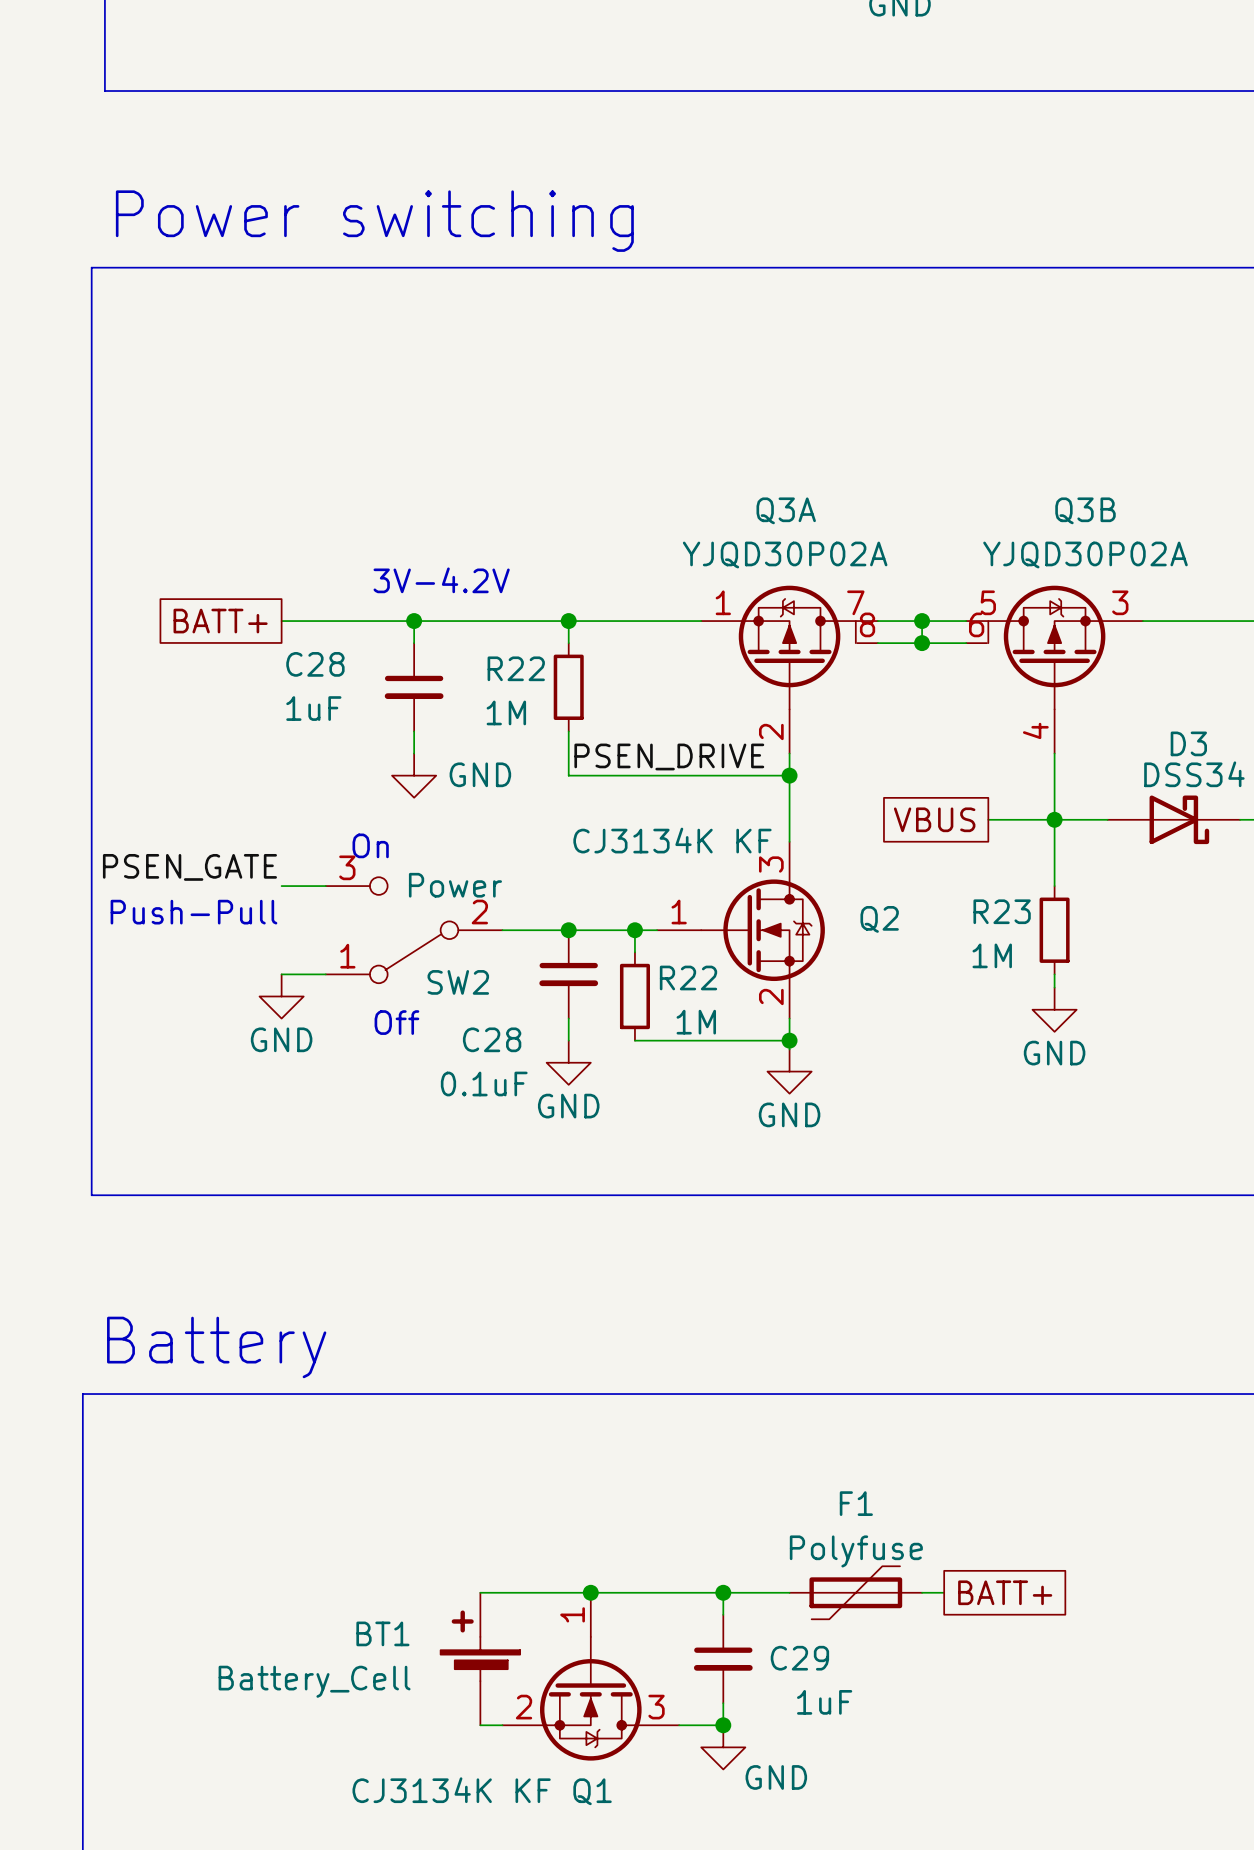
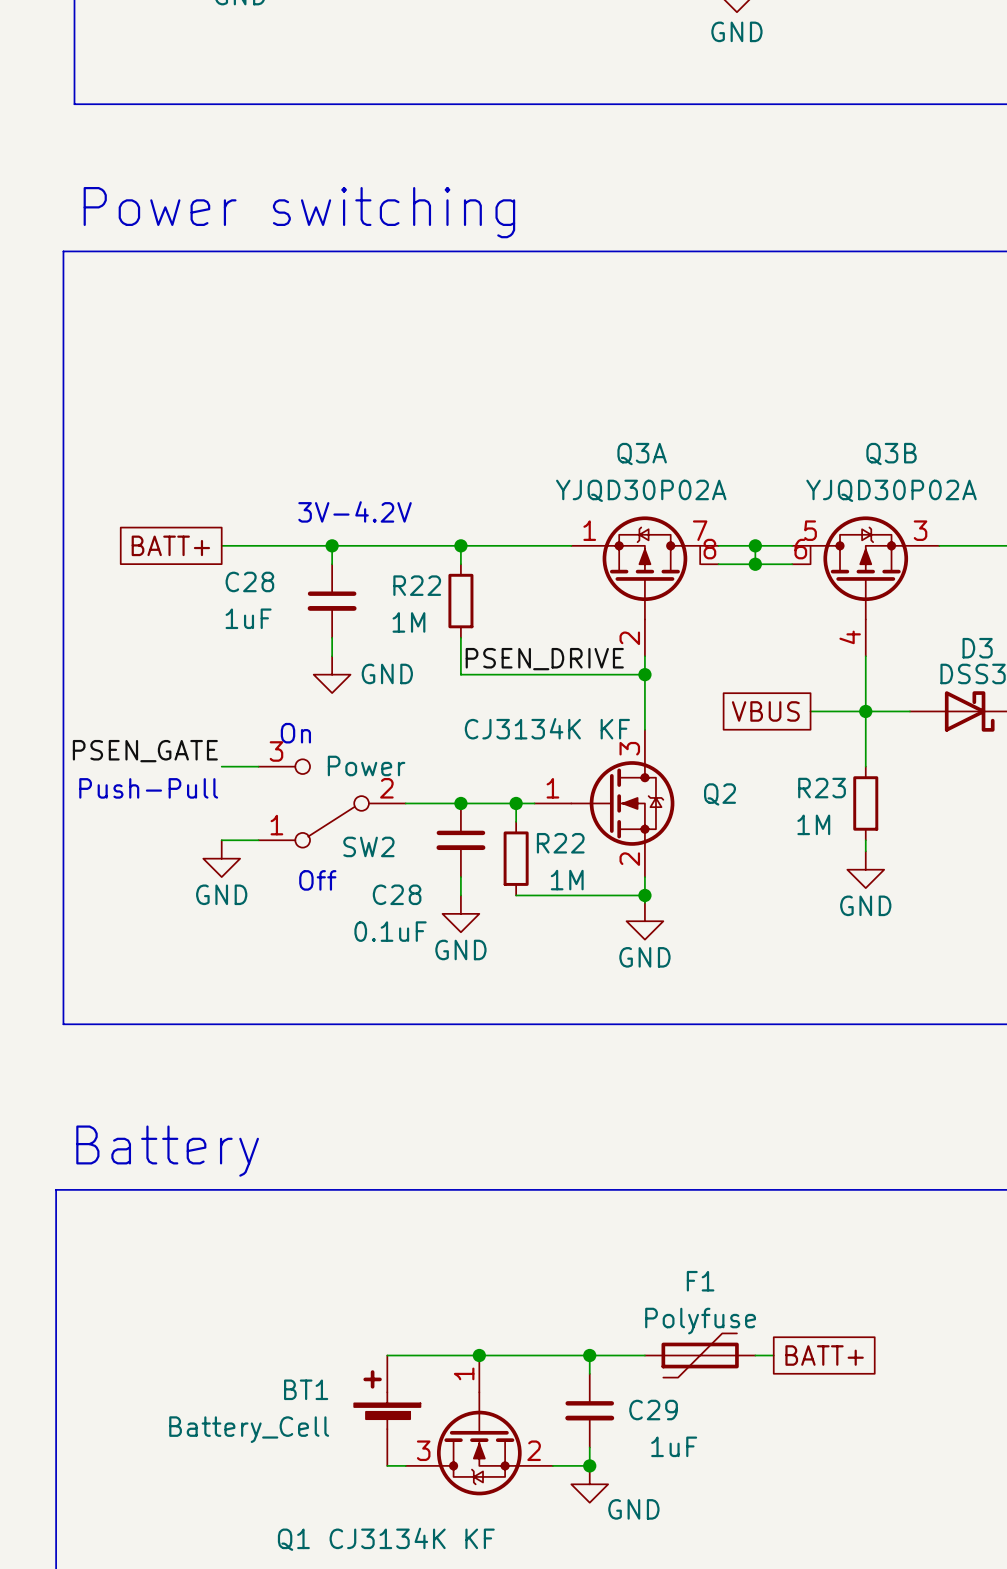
Q1 flip: as is (590, 1698) -> left-right (479, 1443)
Q1 value position: CJ3134K KF (451, 1790) -> CJ3134K KF (412, 1538)
Q1 name position: Q1 (592, 1791) -> Q1 (293, 1539)

